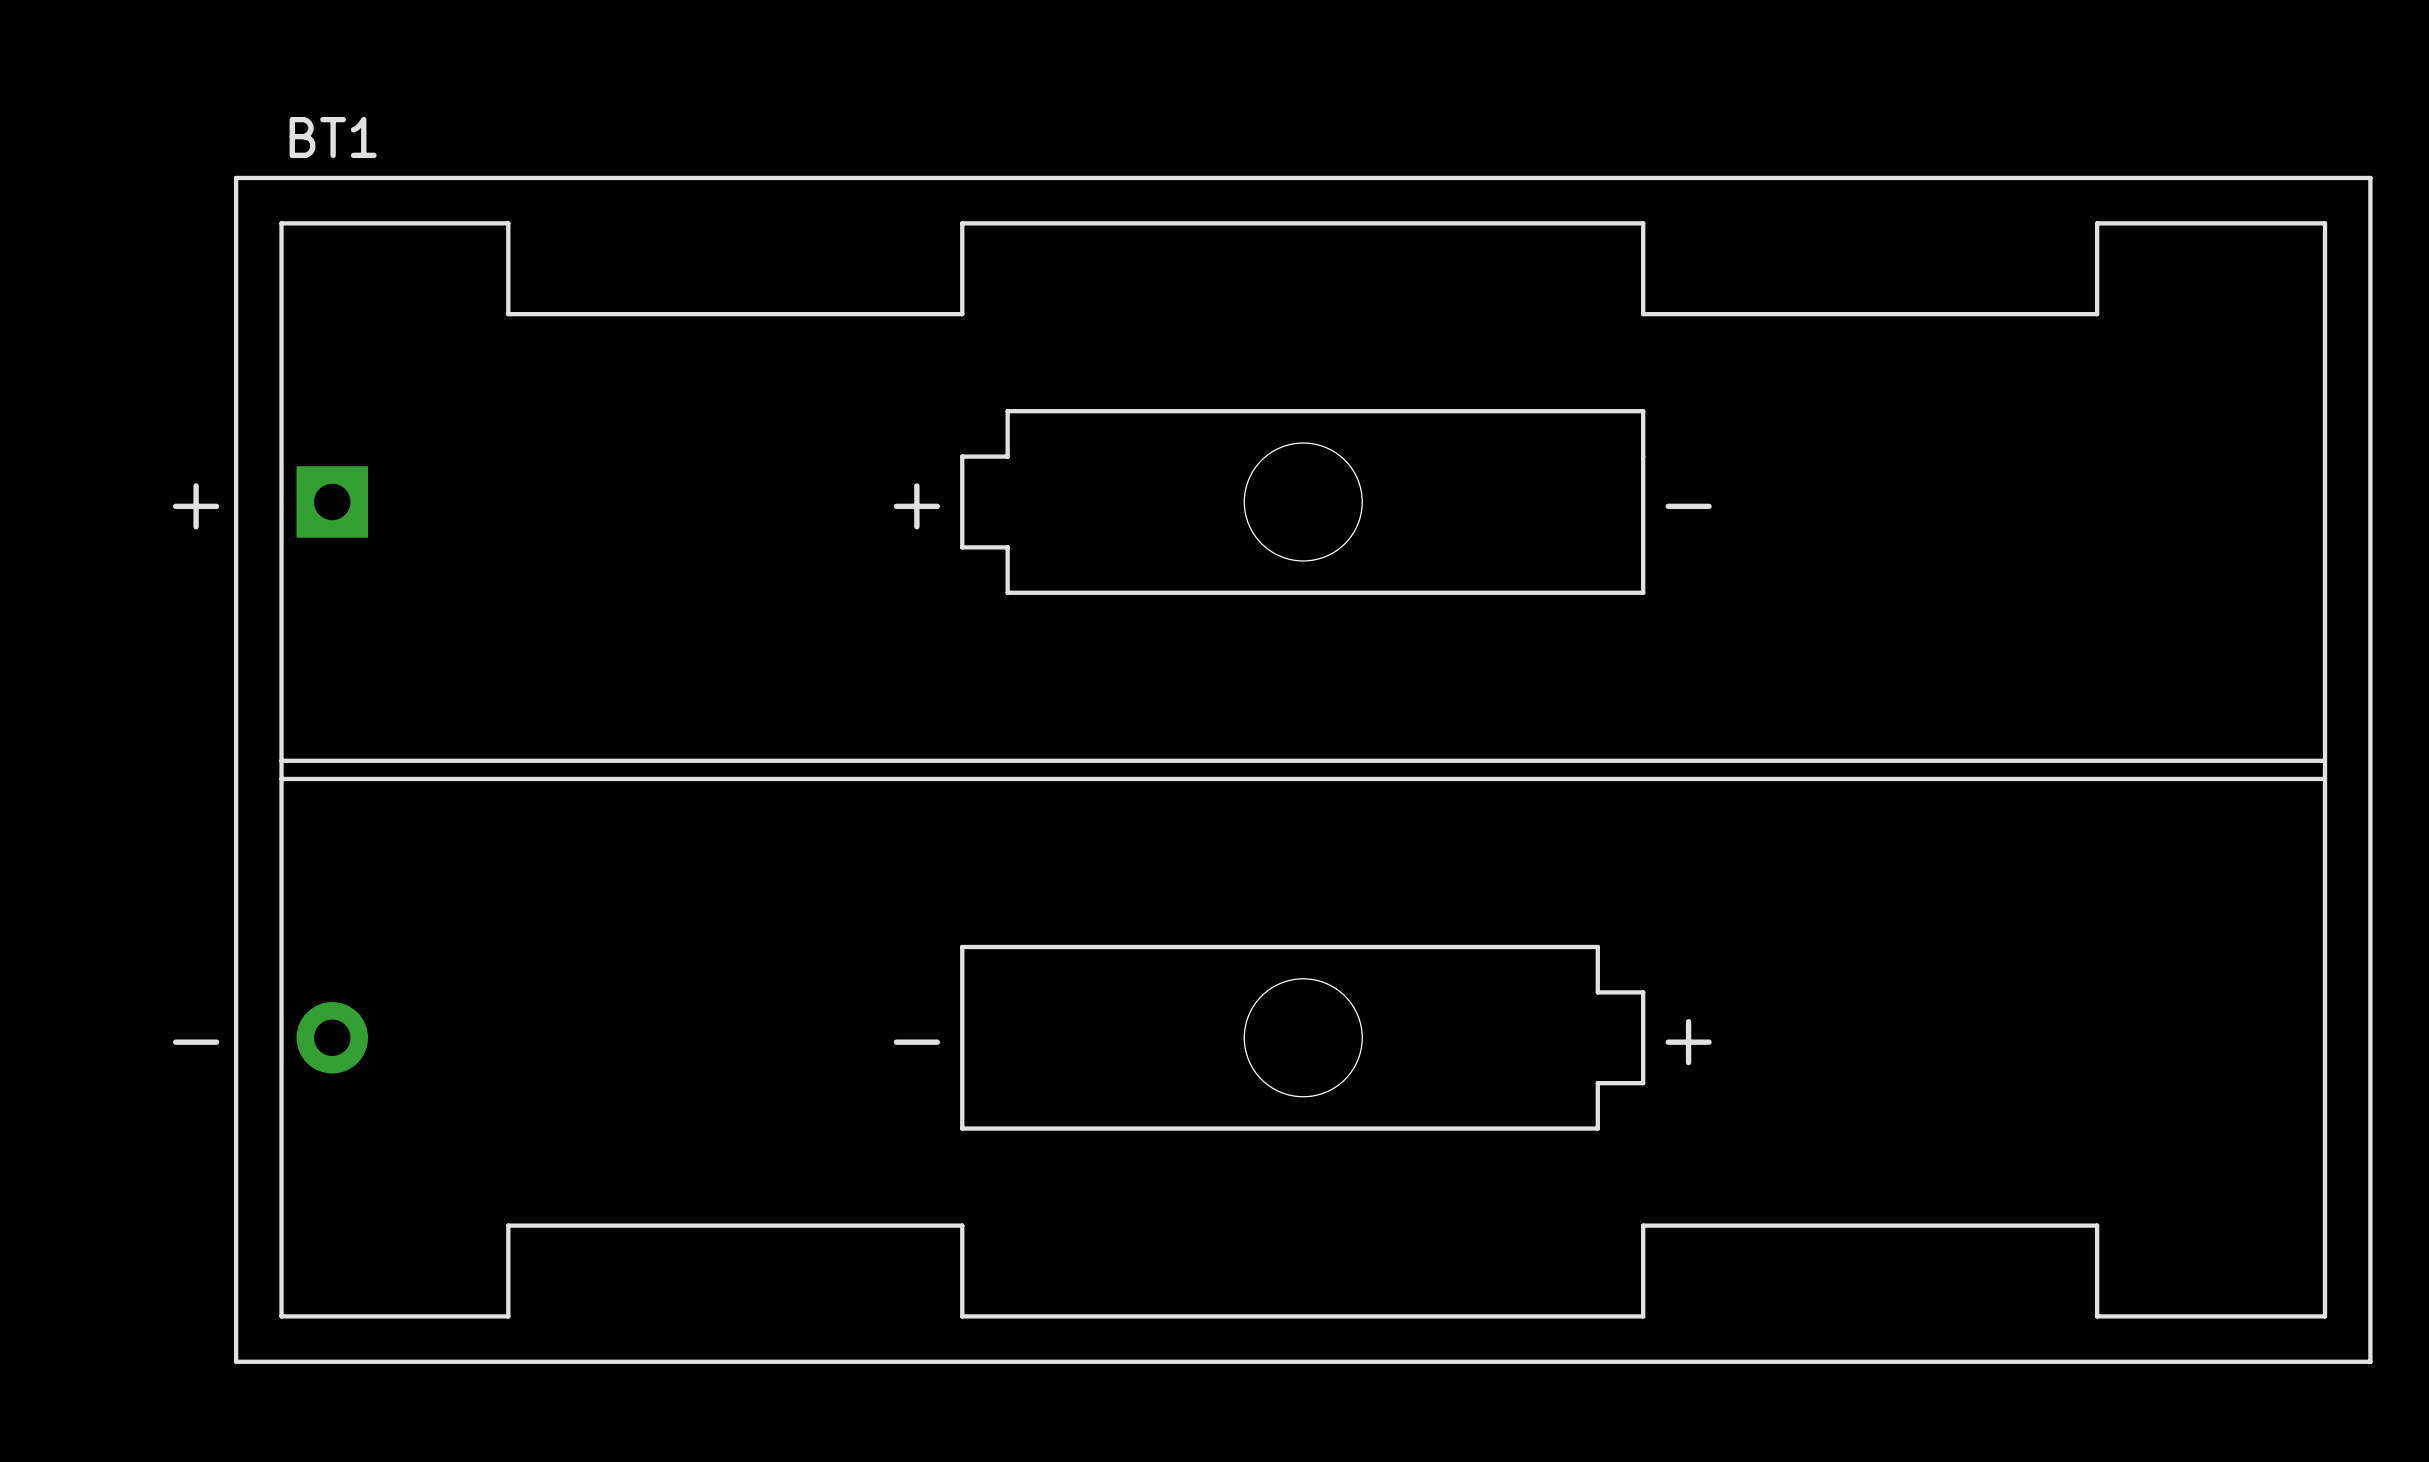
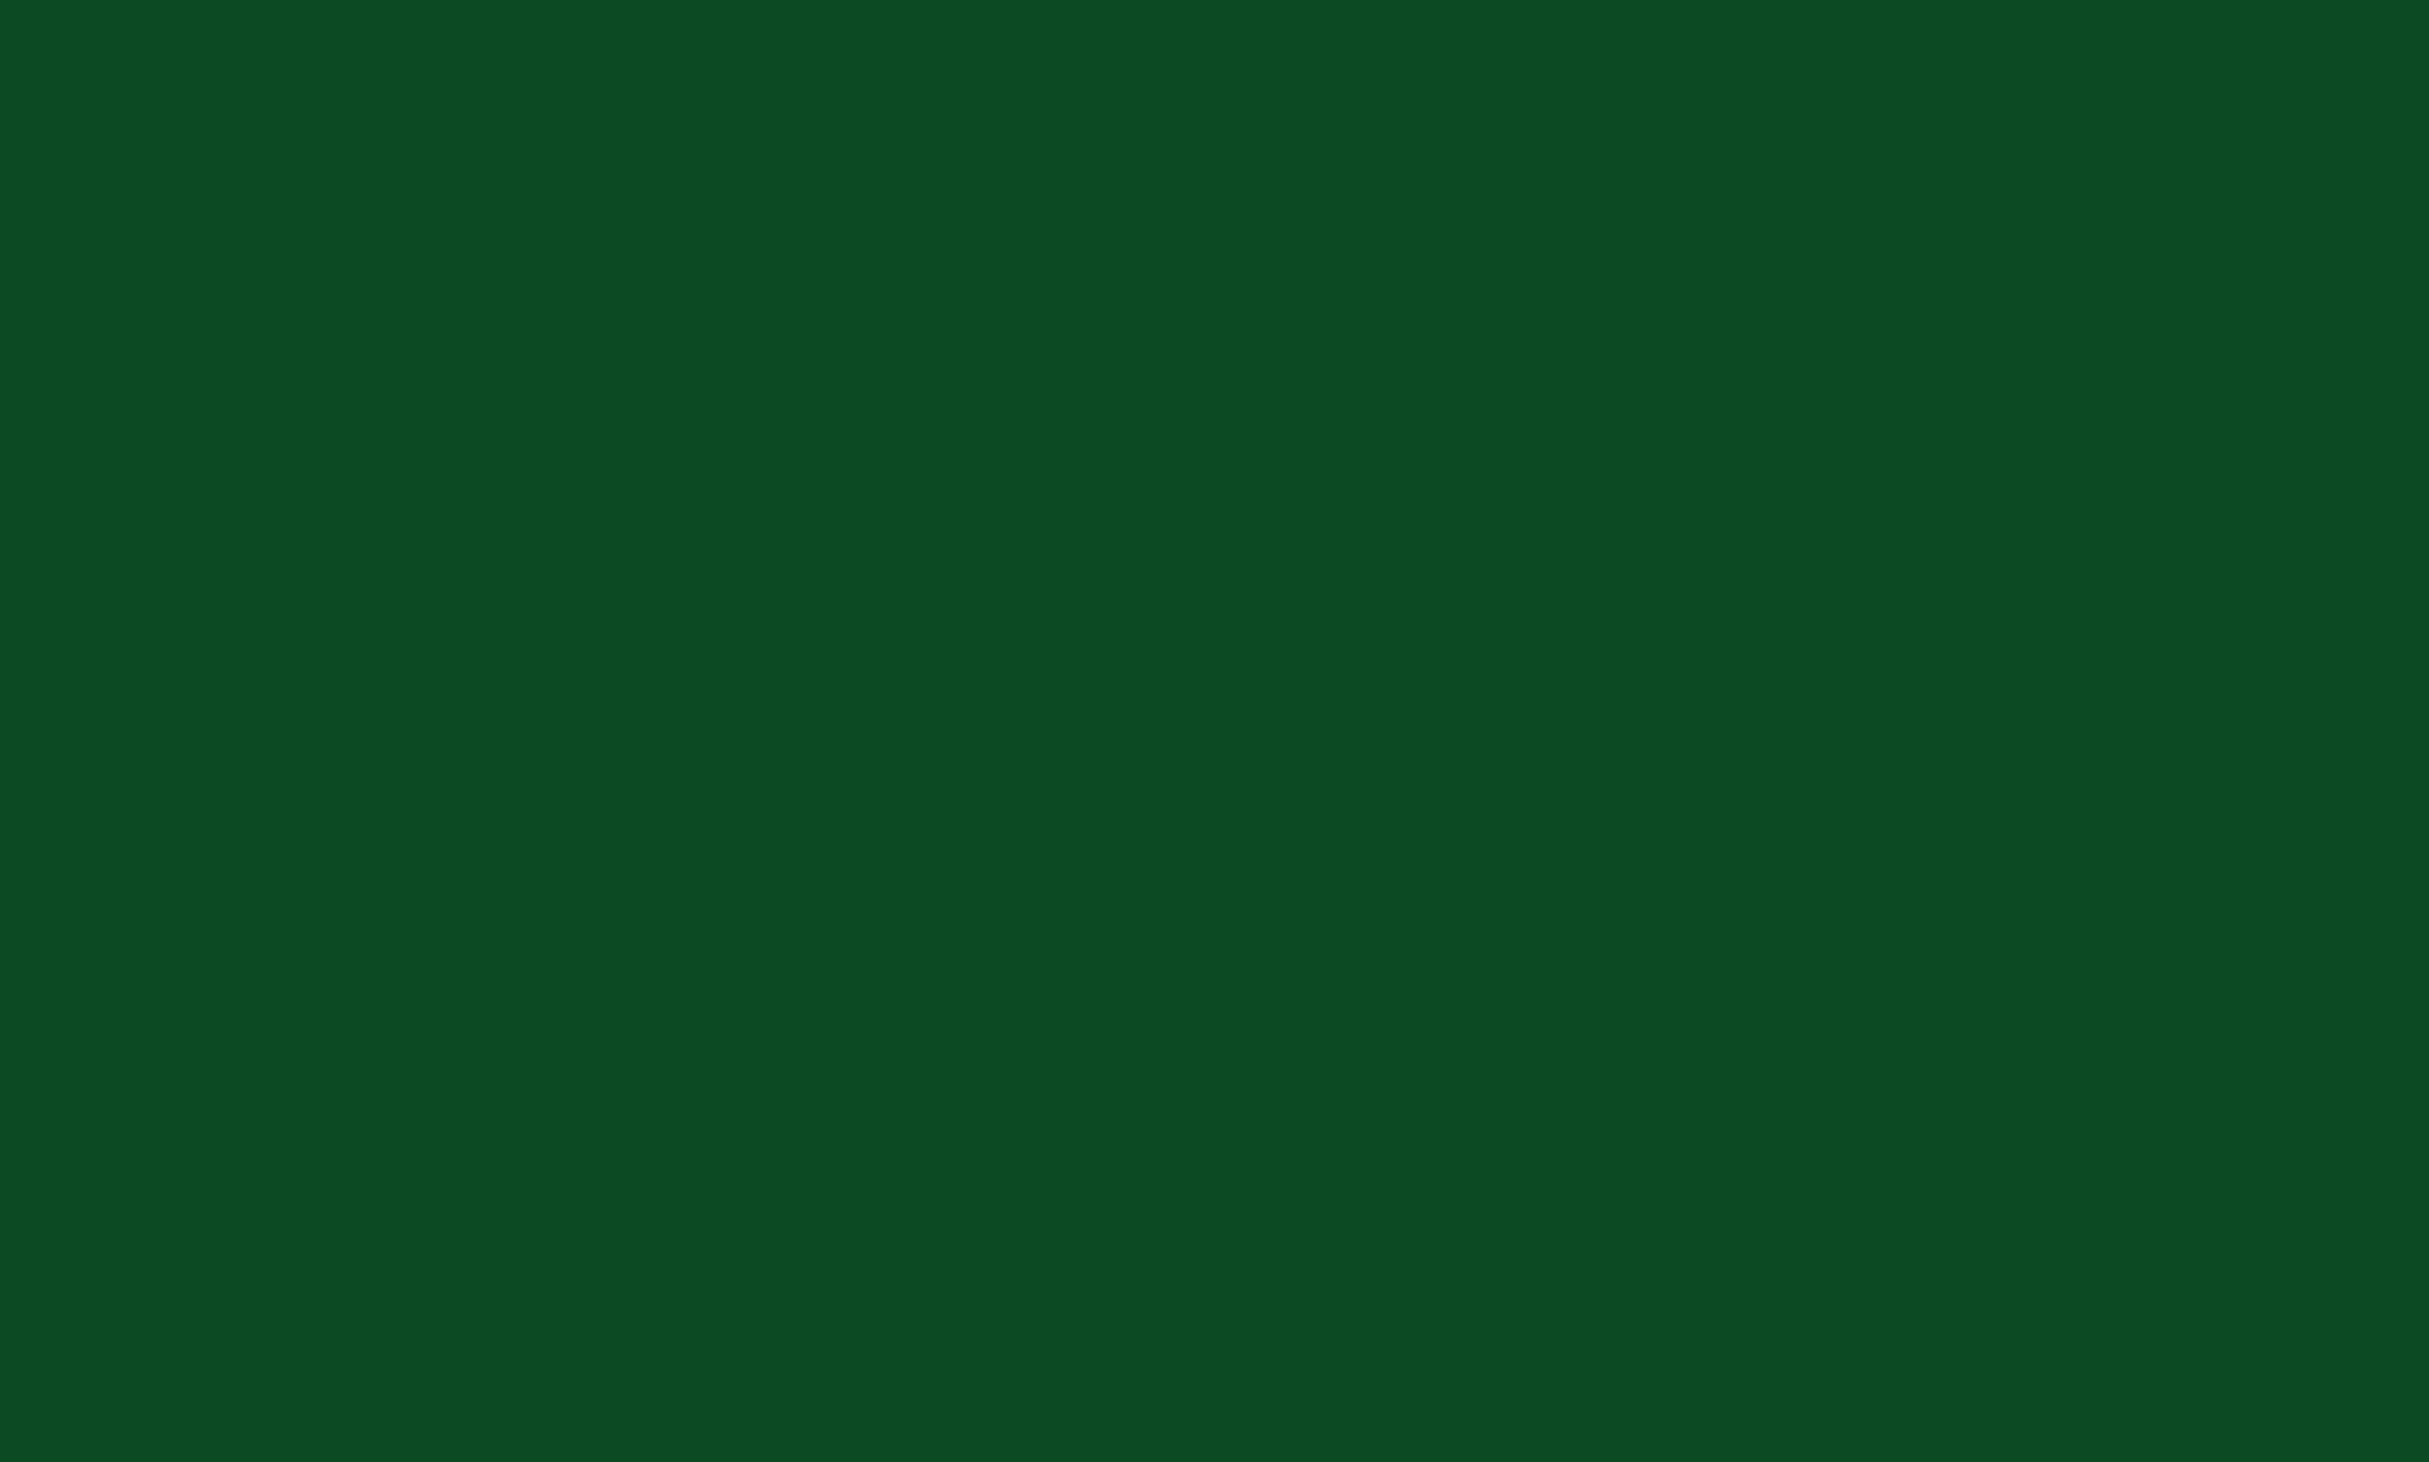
BT1: (1303, 769) -> none

